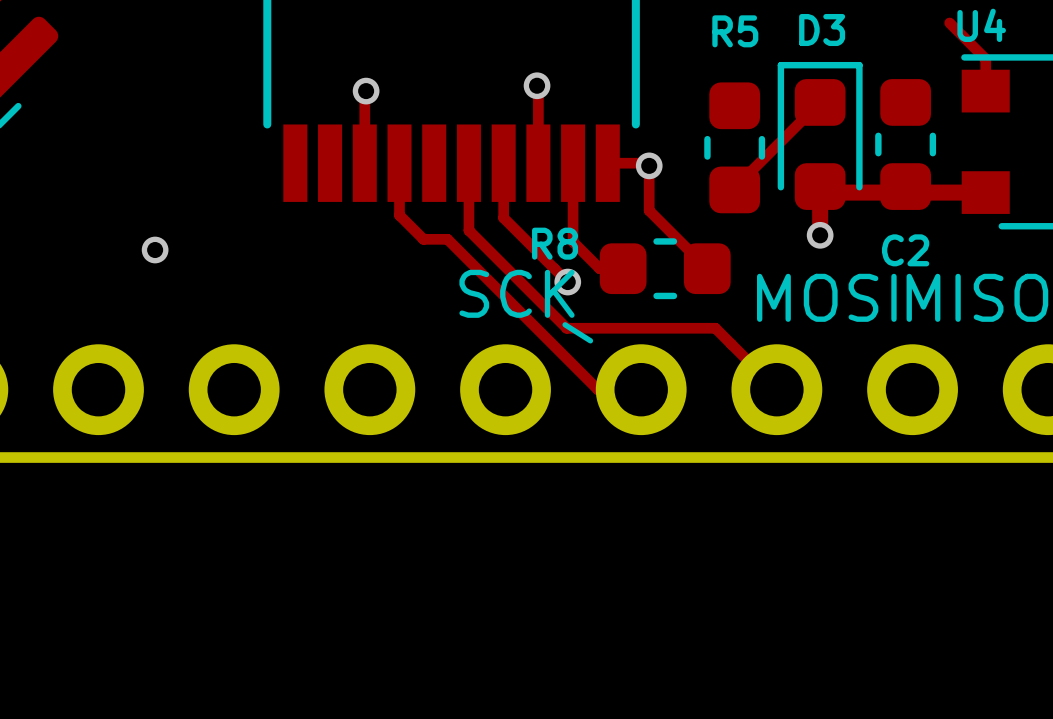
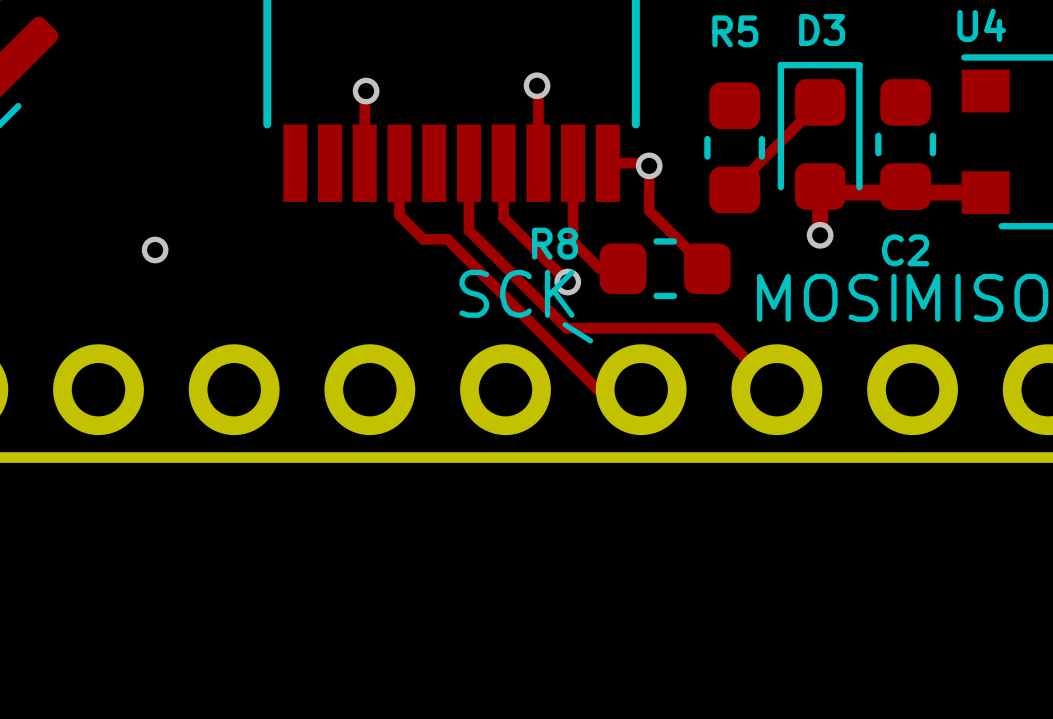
track: (949, 22) (985, 59) (985, 91) -> none

